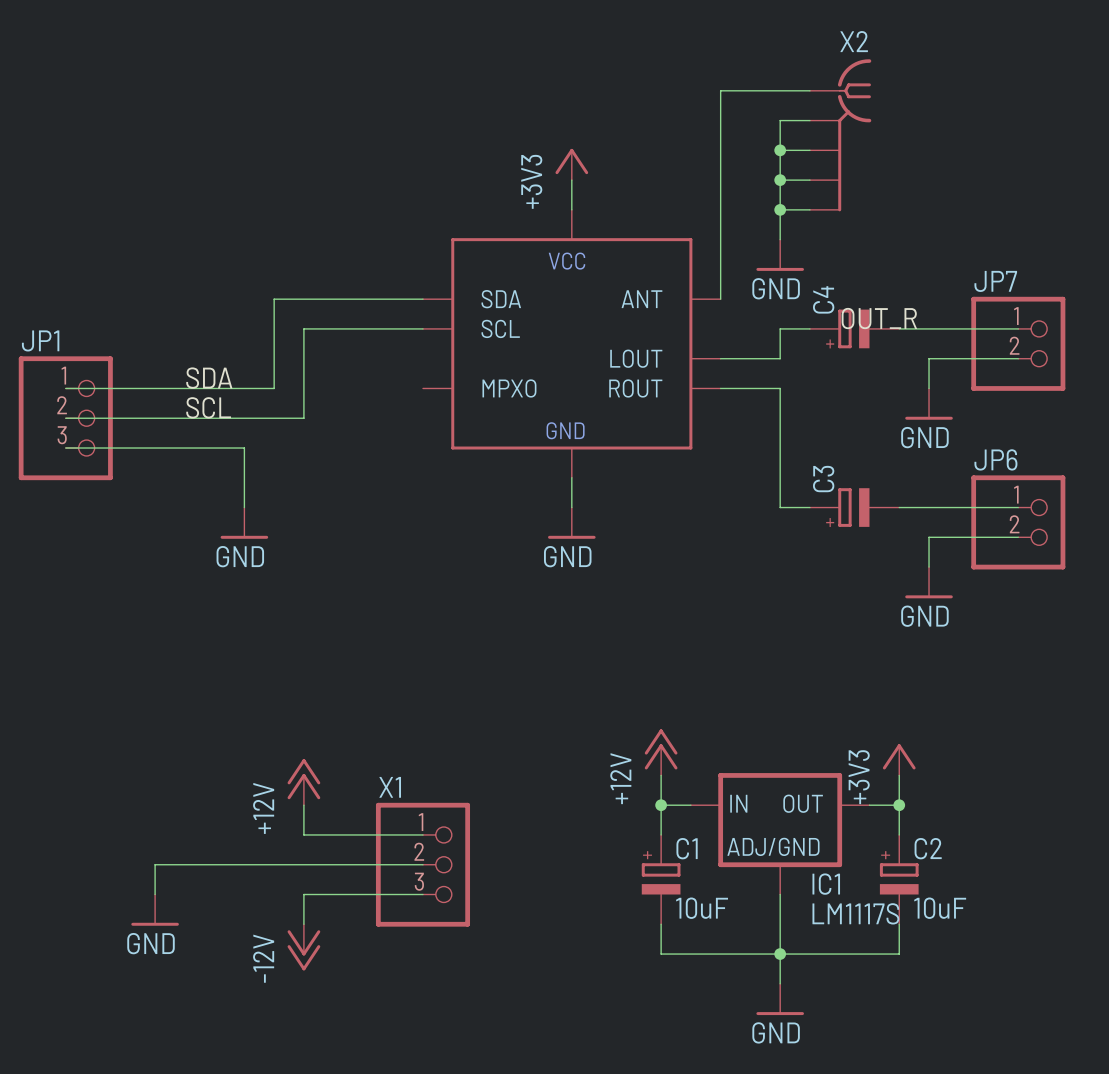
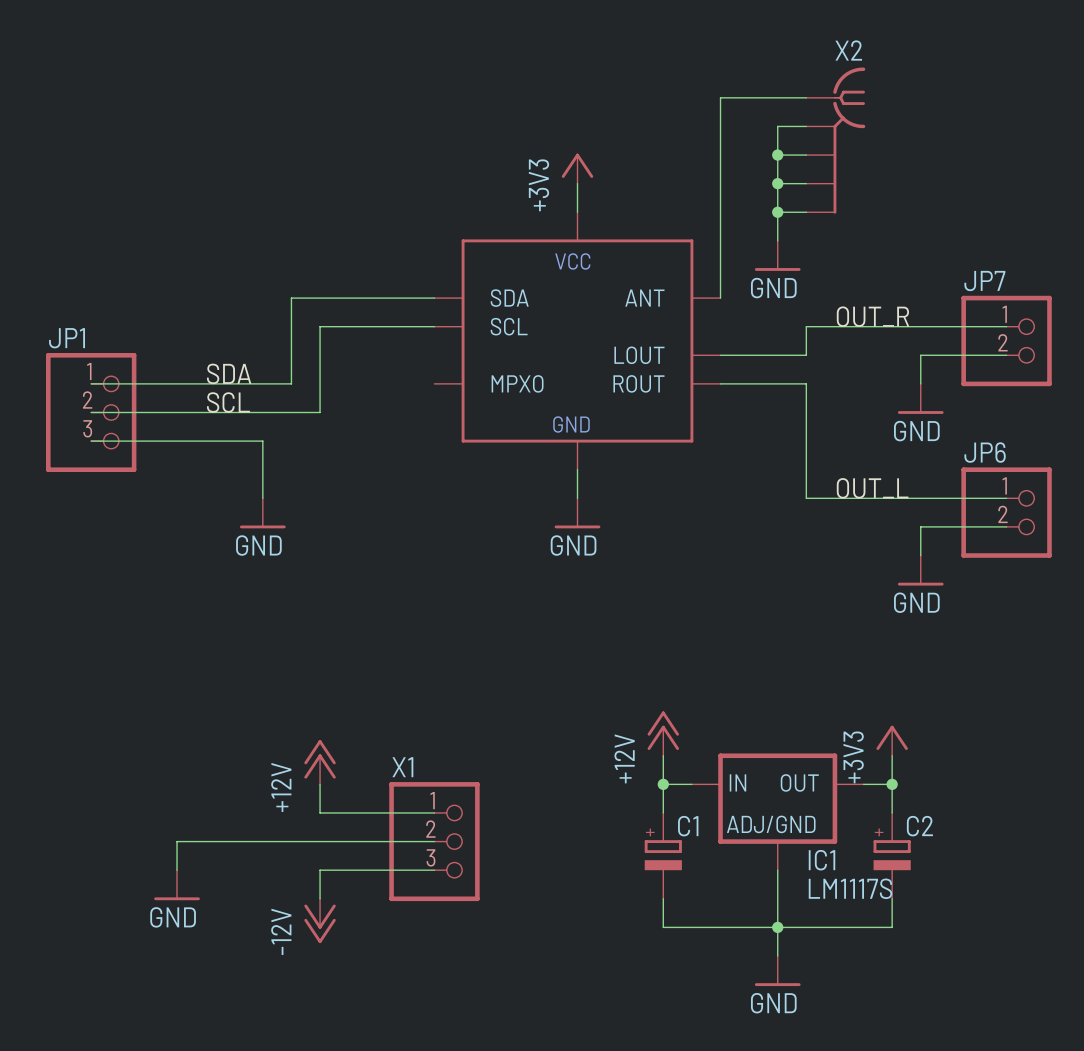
wire: (809, 328) (780, 328) (780, 358) -> (892, 326) (806, 326) (806, 355) (777, 355)
C4: (854, 328) -> none
wire: (780, 388) (780, 507) (809, 507) -> (777, 383) (806, 383) (806, 498) (892, 498)
label: none -> OUT_L (872, 488)
C3: (854, 507) -> none
C1 value: 10uF (702, 908) -> none
C2 value: 10uF (940, 908) -> none

